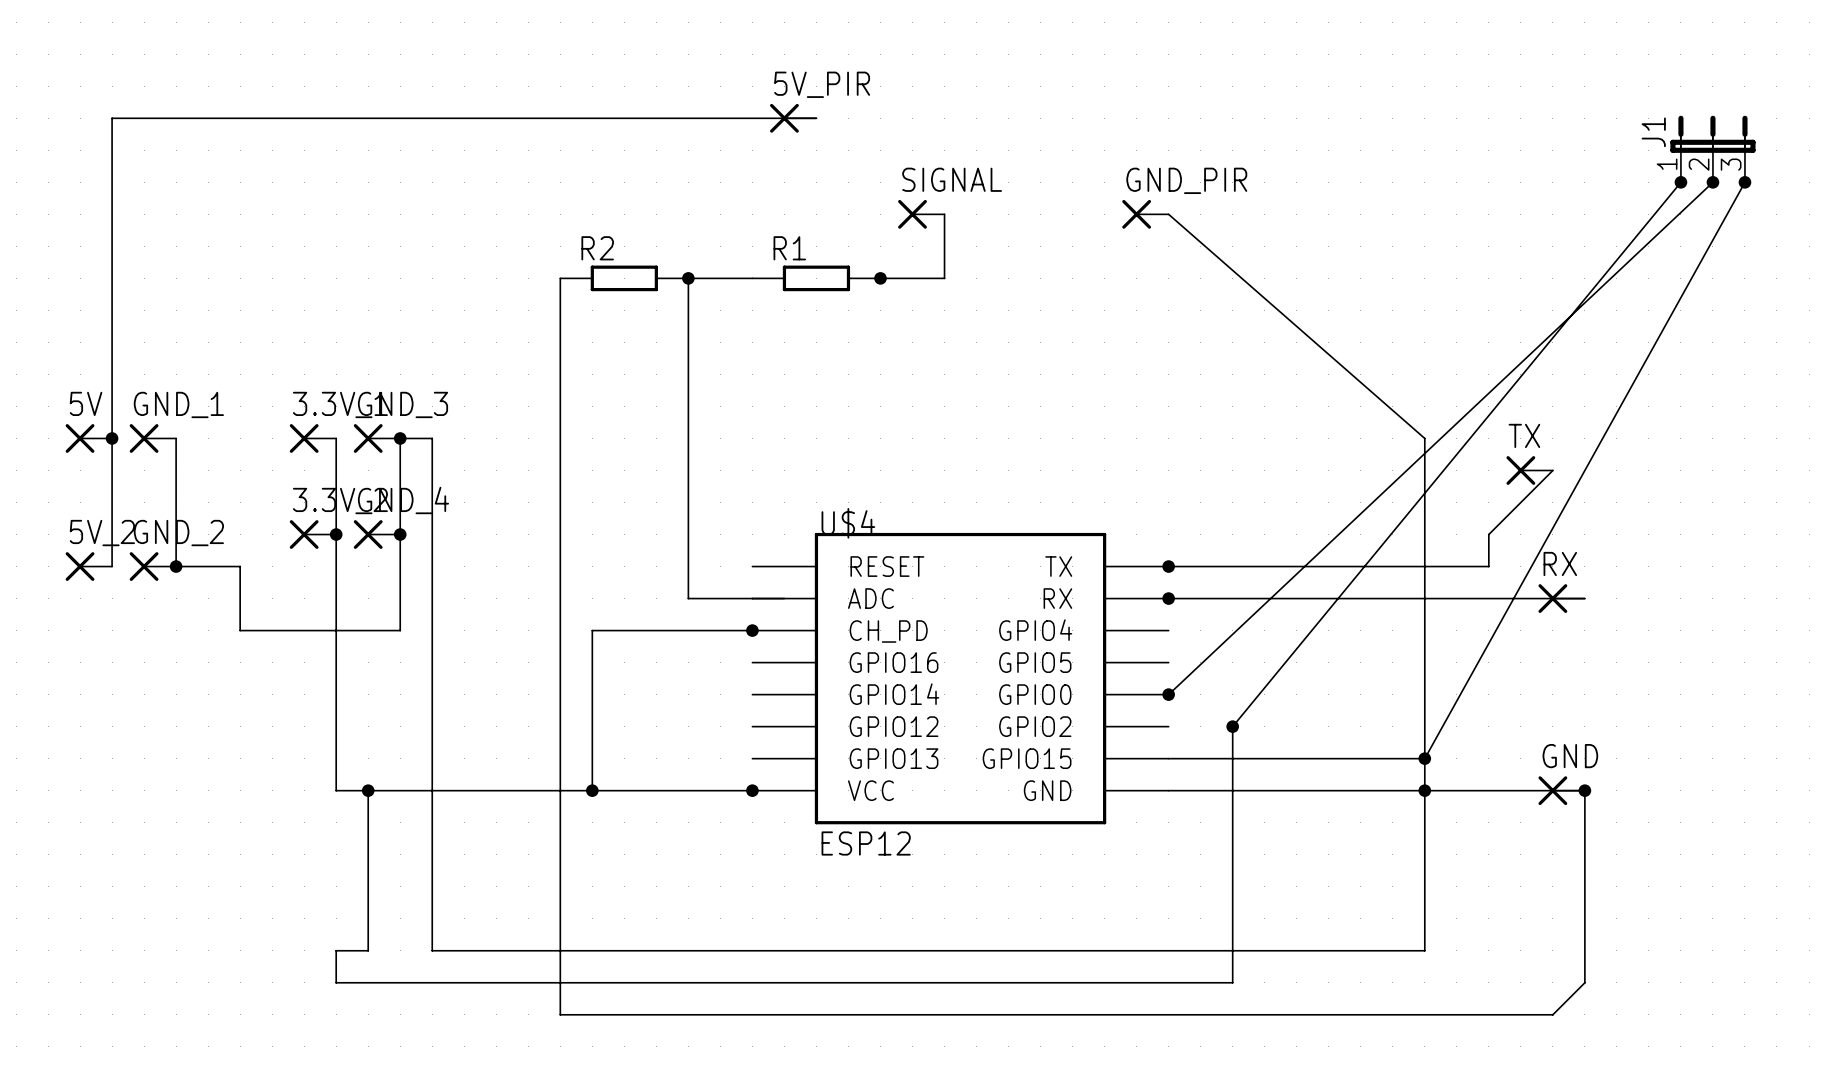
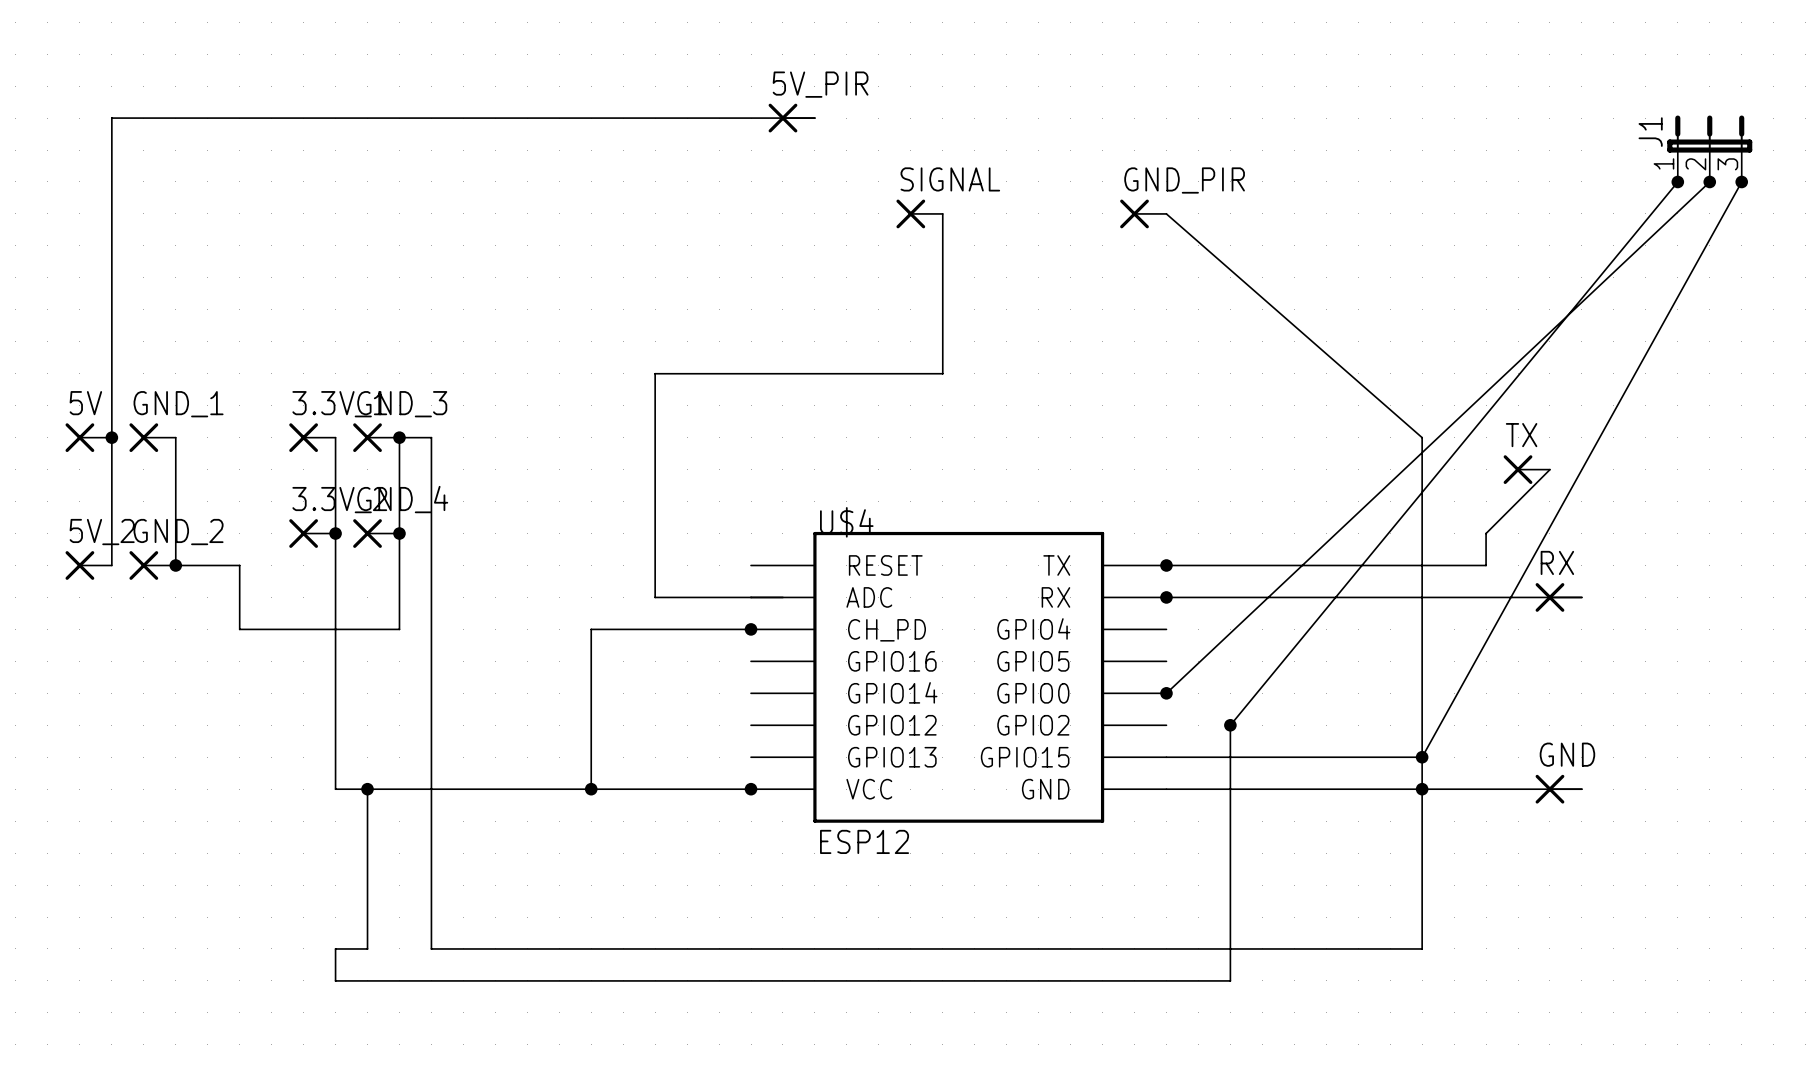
wire: (560, 278) (560, 1014) (1552, 1014) (1584, 982) (1584, 790) -> none
R2: (624, 278) -> none
junction: (688, 278) -> none
wire: (752, 278) (688, 278) (688, 598) -> (942, 277) (942, 373) (655, 373) (655, 597) (687, 597)
R1: (816, 278) -> none
wire: (880, 278) (944, 278) -> none
junction: (880, 278) -> none
junction: (1584, 790) -> none

